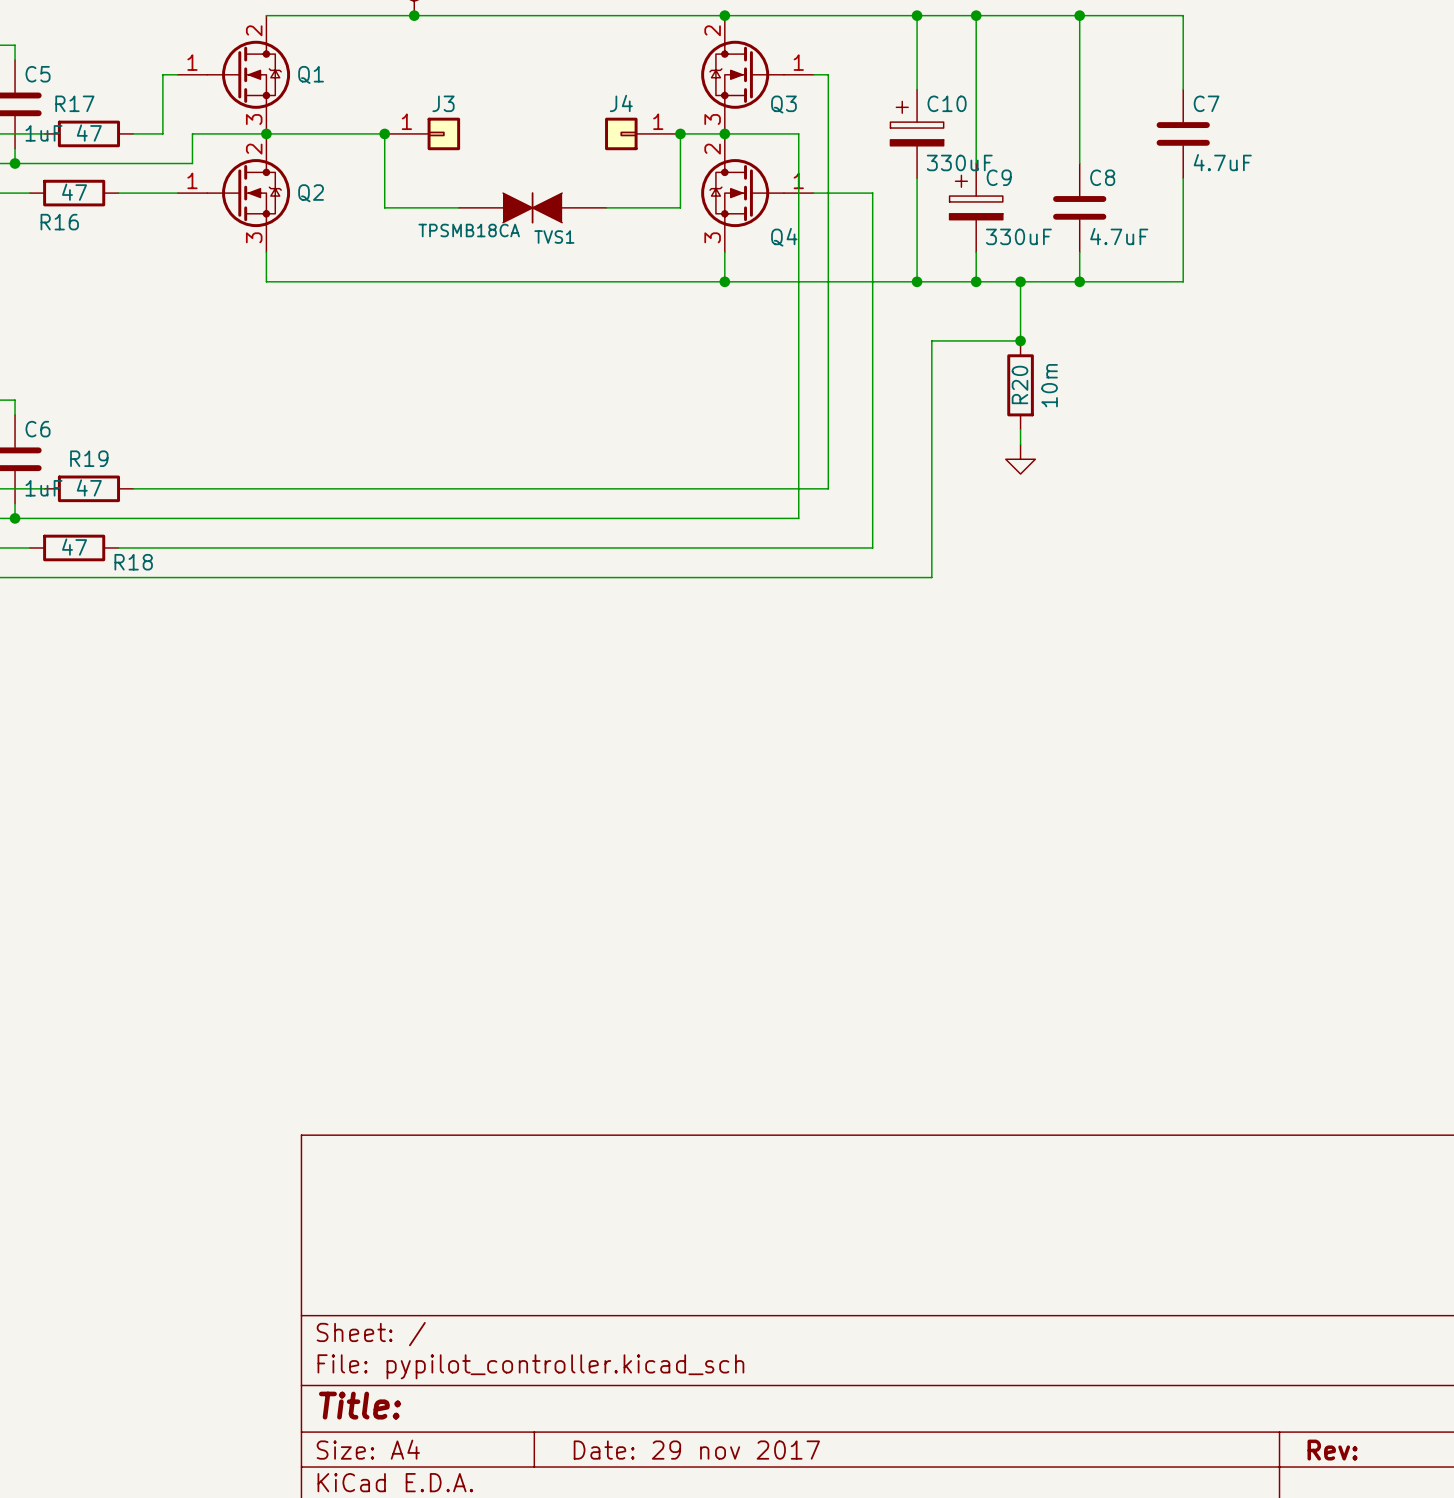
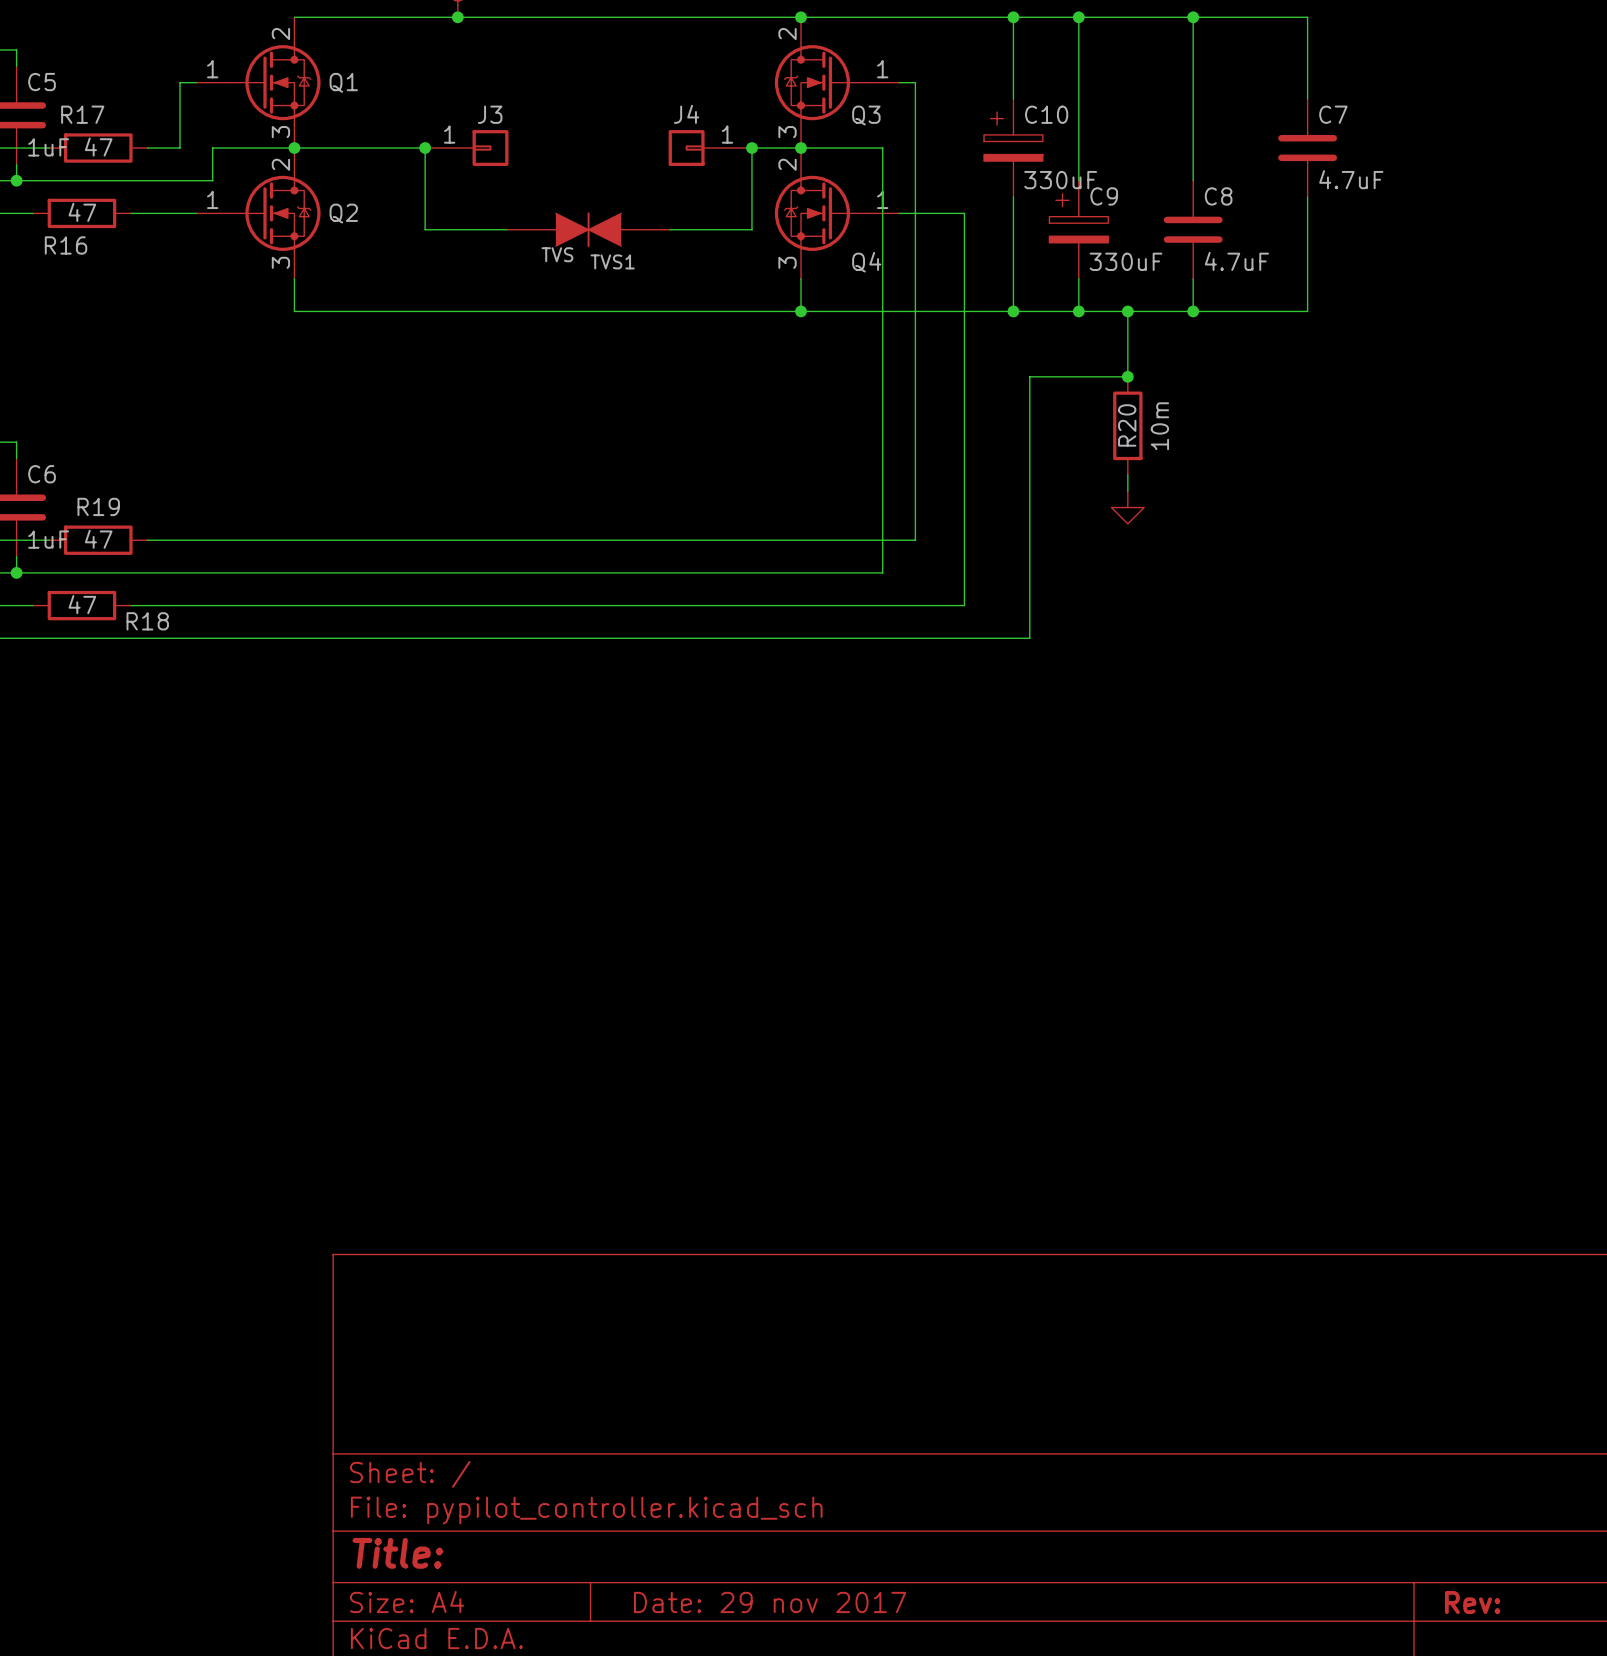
TVS1 value: TPSMB18CA (469, 230) -> TVS (557, 254)

